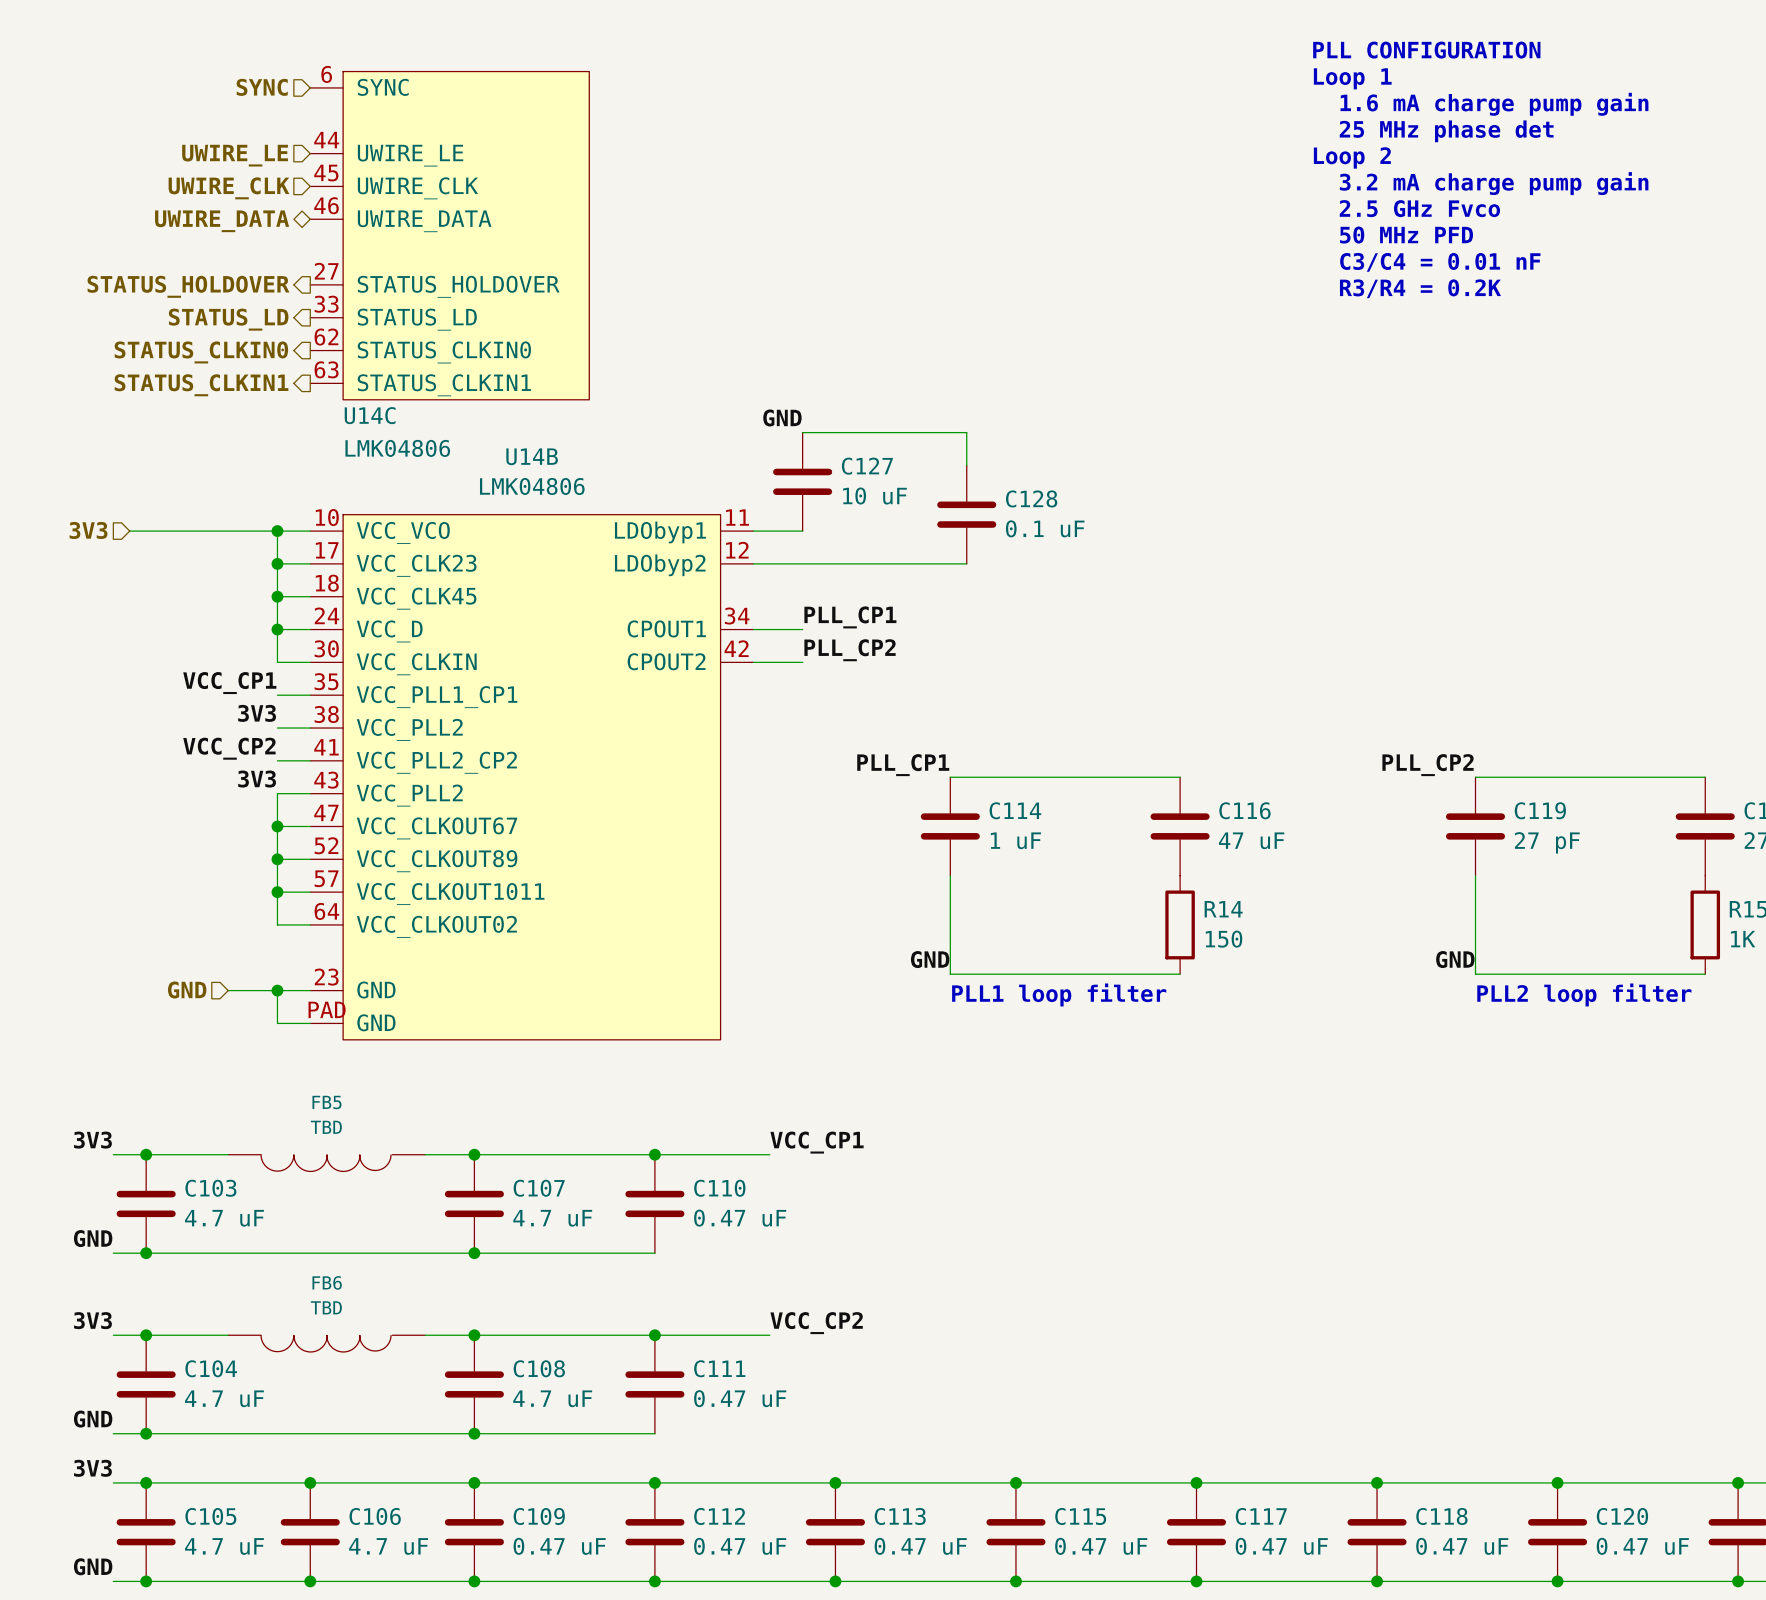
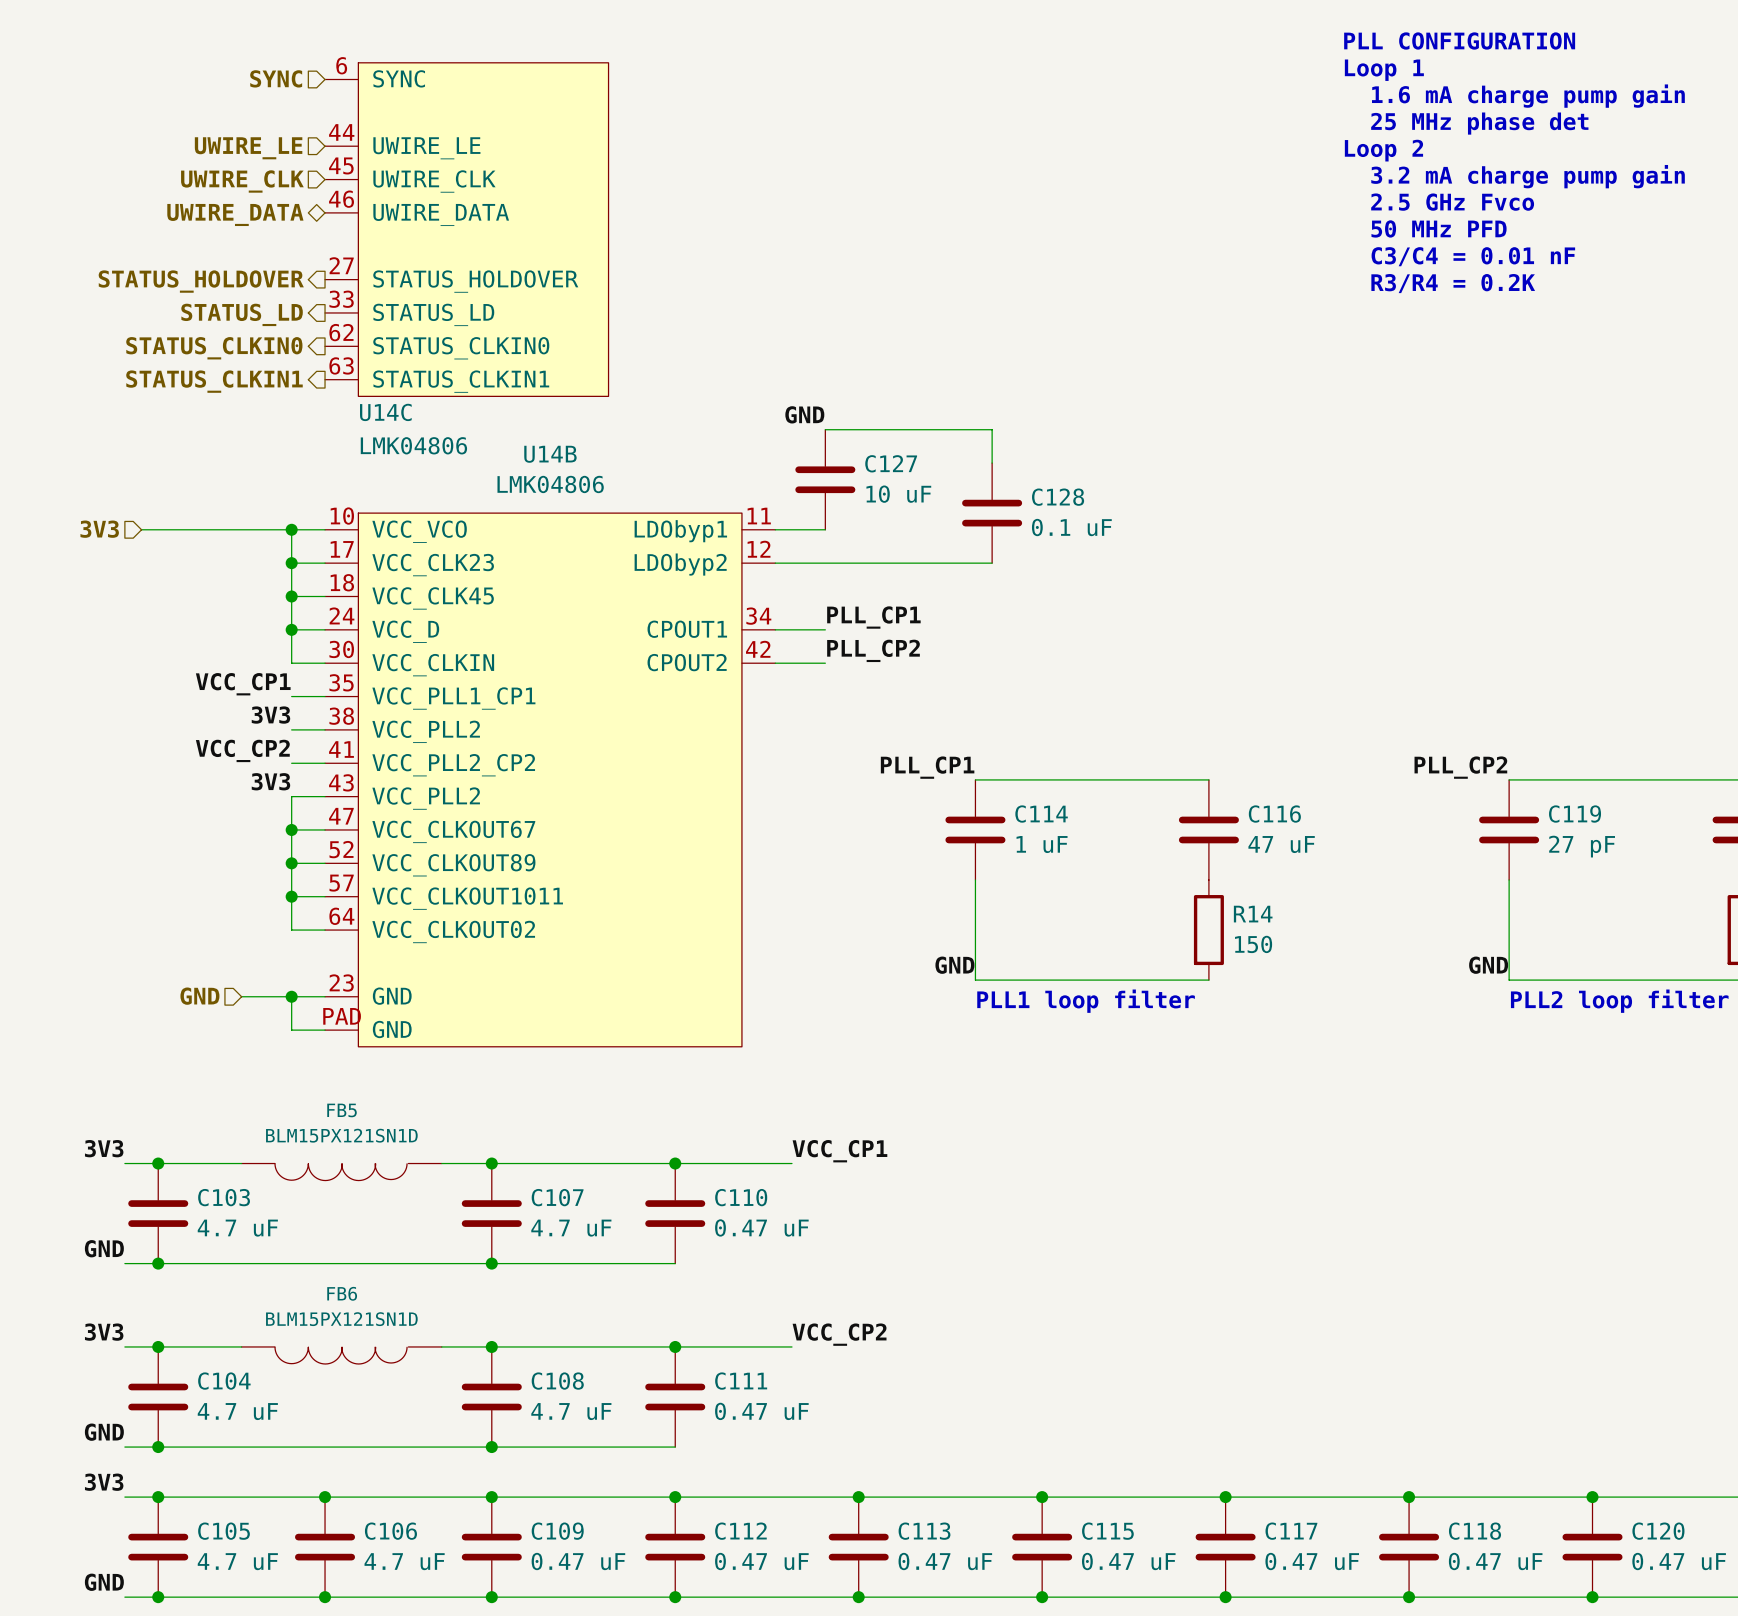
FB5 value: TBD (326, 1127) -> BLM15PX121SN1D (341, 1135)
FB6 value: TBD (326, 1307) -> BLM15PX121SN1D (341, 1319)

